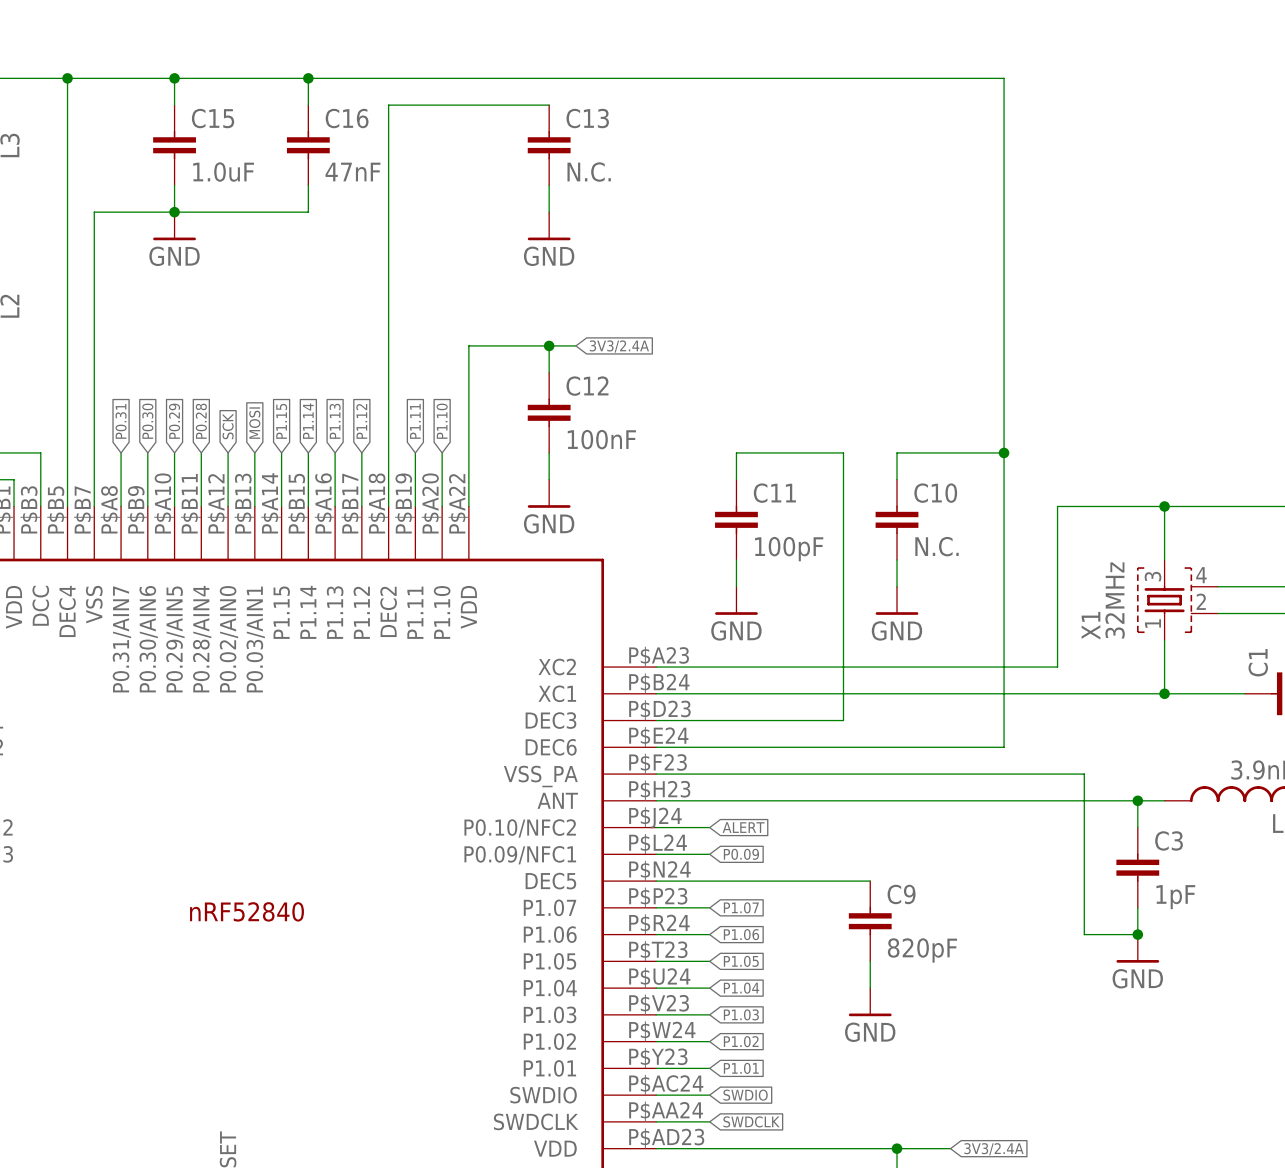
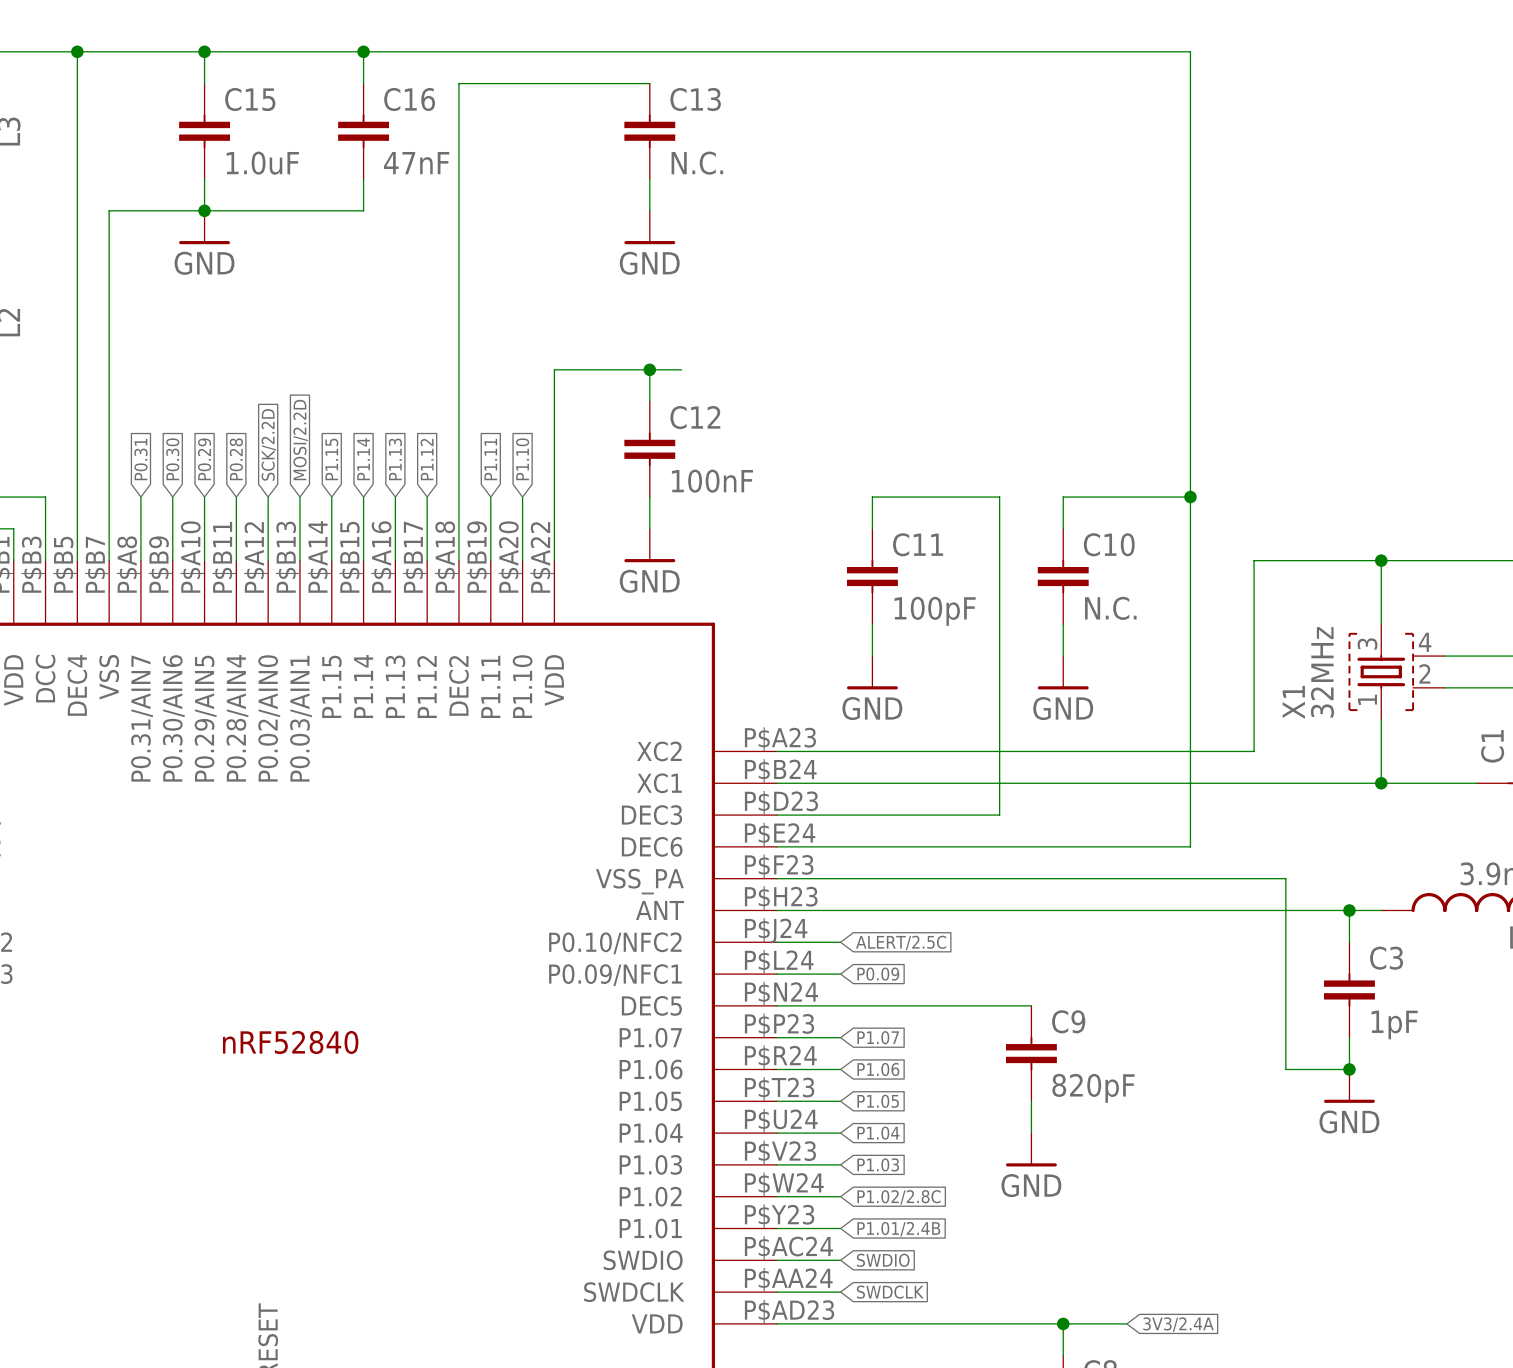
global label: 3V3/2.4A (619, 346) -> none
global label: MOSI (254, 423) -> MOSI/2.2D (300, 440)
global label: SCK (228, 426) -> SCK/2.2D (268, 444)
global label: ALERT (743, 827) -> ALERT/2.5C (901, 942)
global label: P1.02 (741, 1041) -> P1.02/2.8C (899, 1197)
global label: P1.01 (741, 1068) -> P1.01/2.4B (898, 1229)

